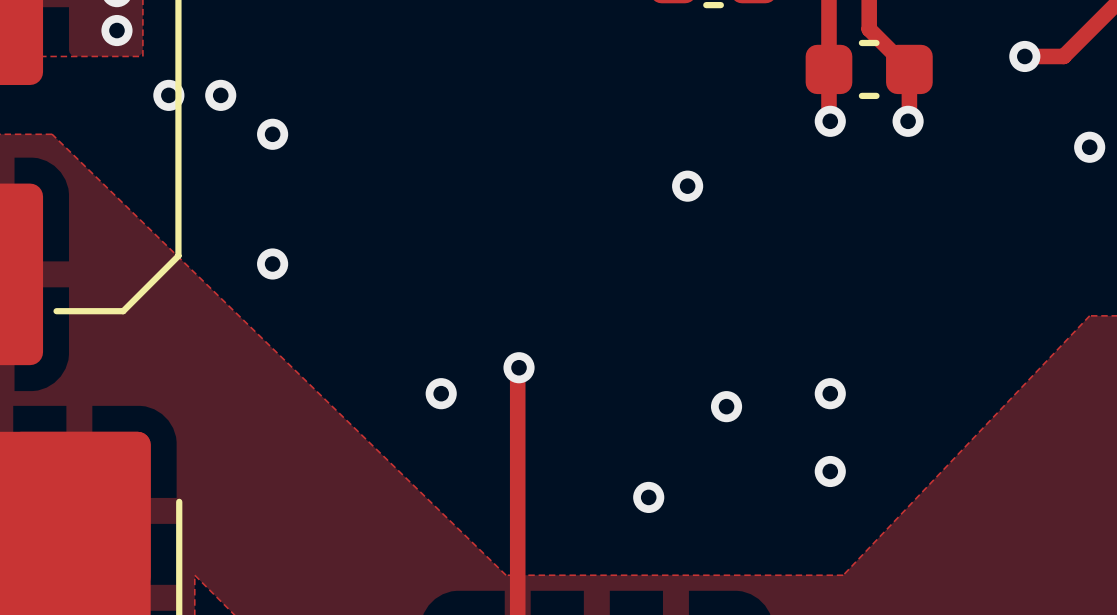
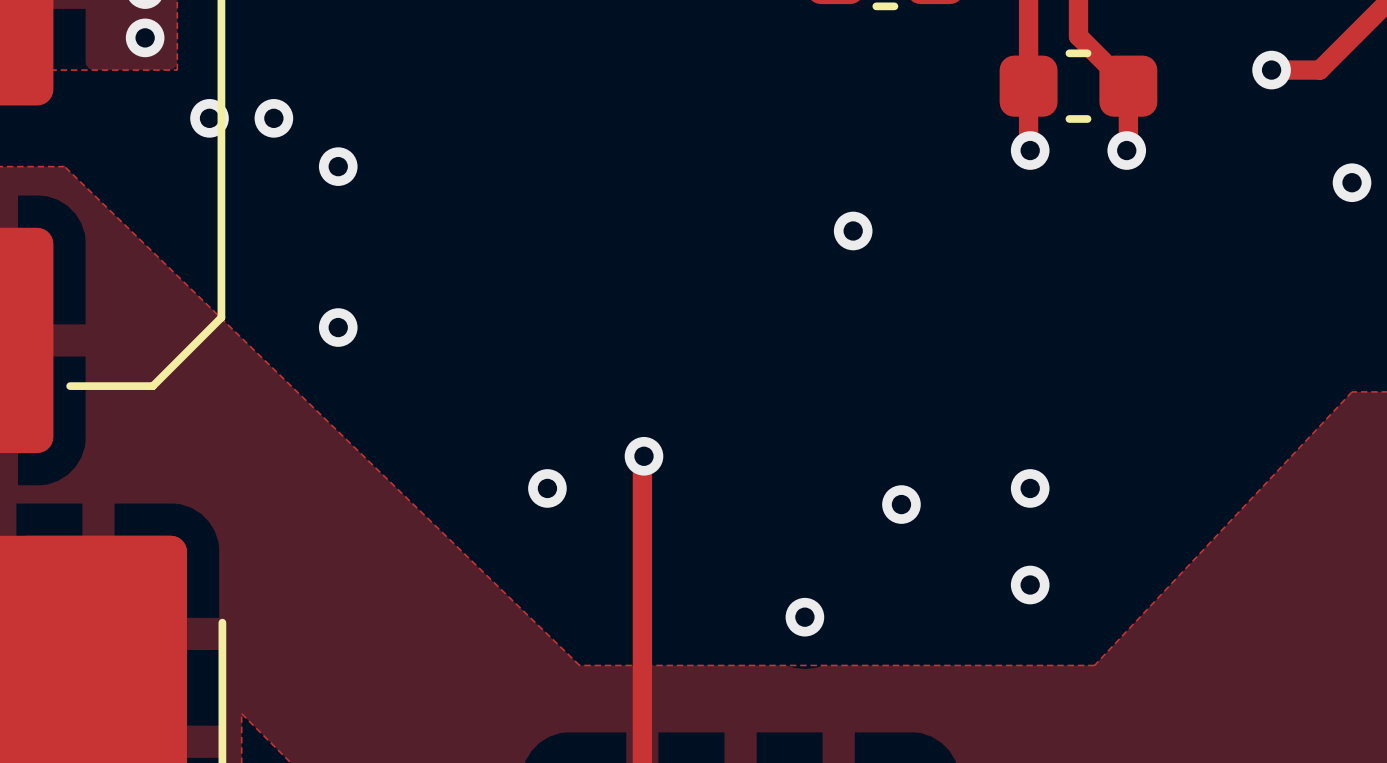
zone outline: (52, 134) (506, 575) (843, 575) (1089, 315) -> (64, 166) (579, 665) (1094, 665) (1352, 391)

